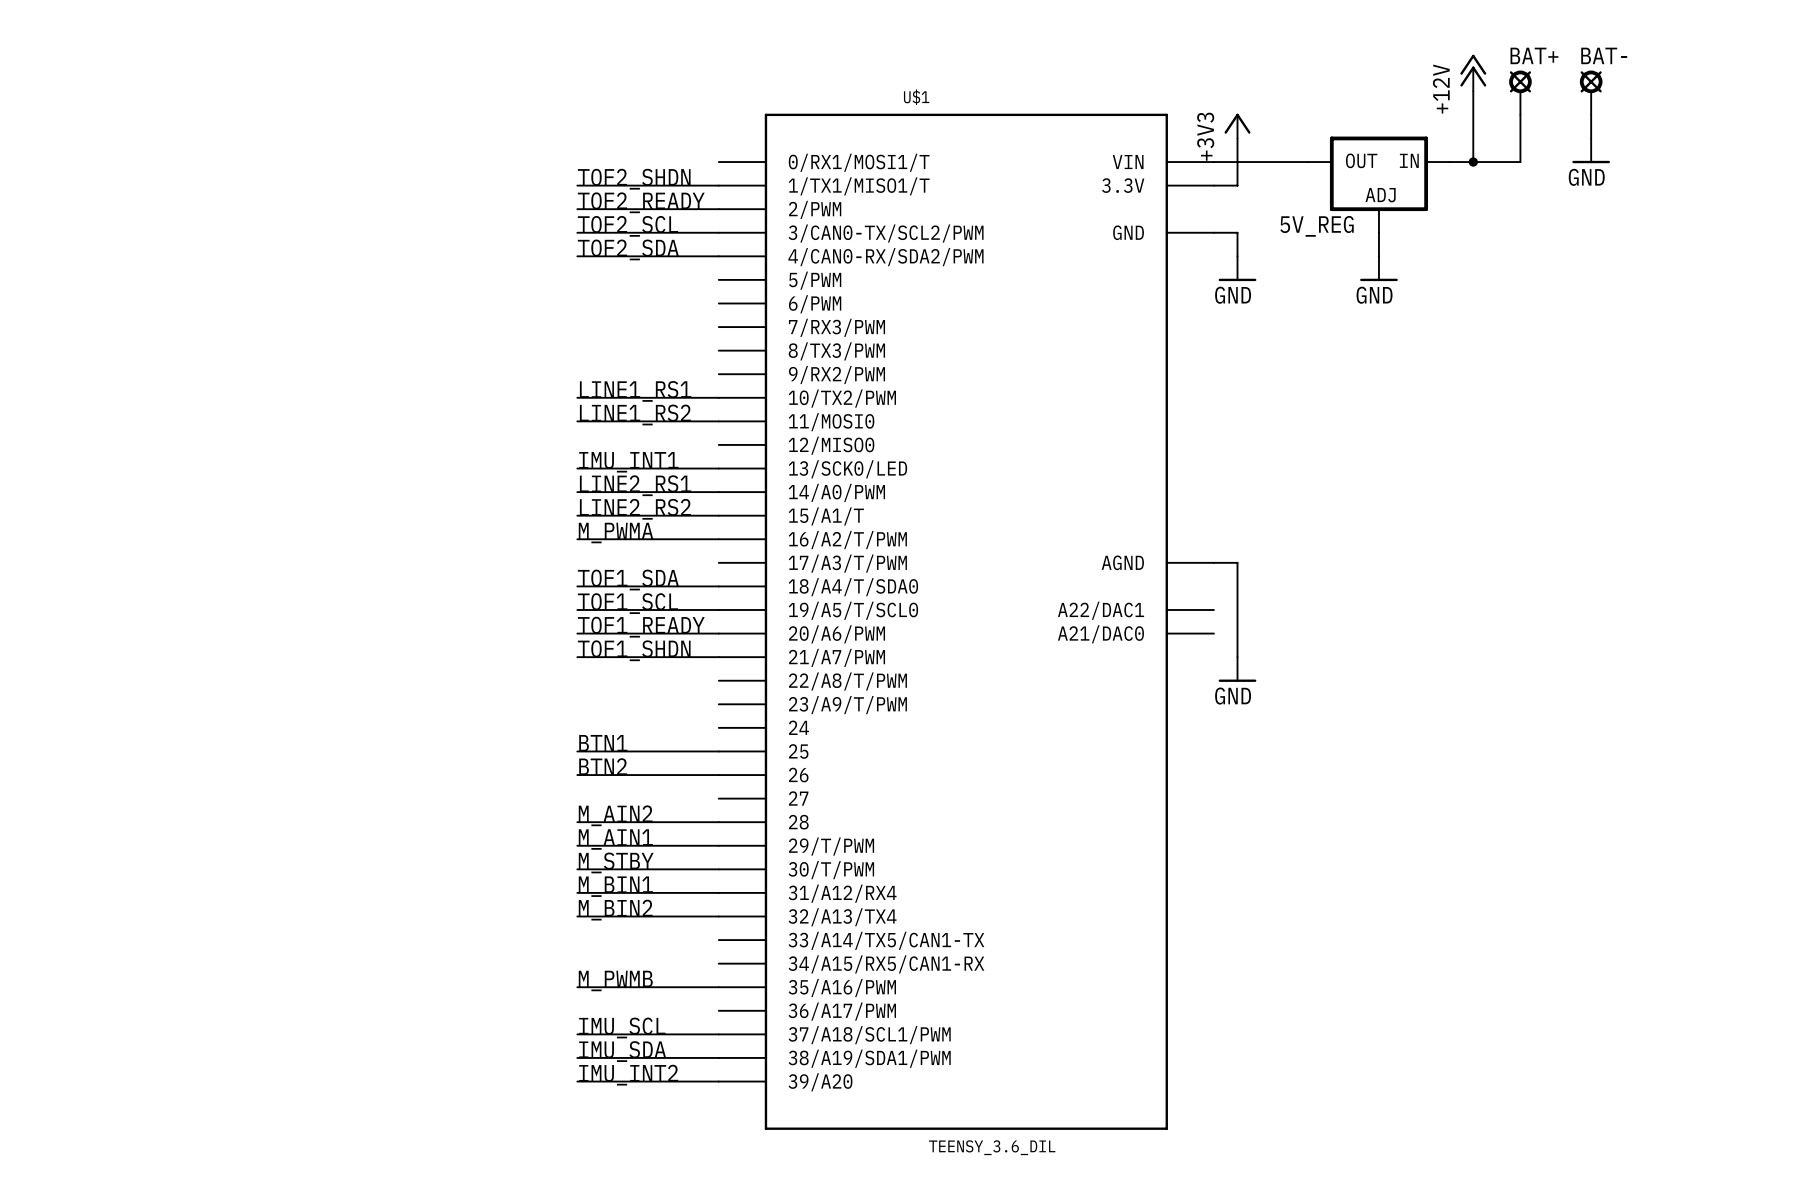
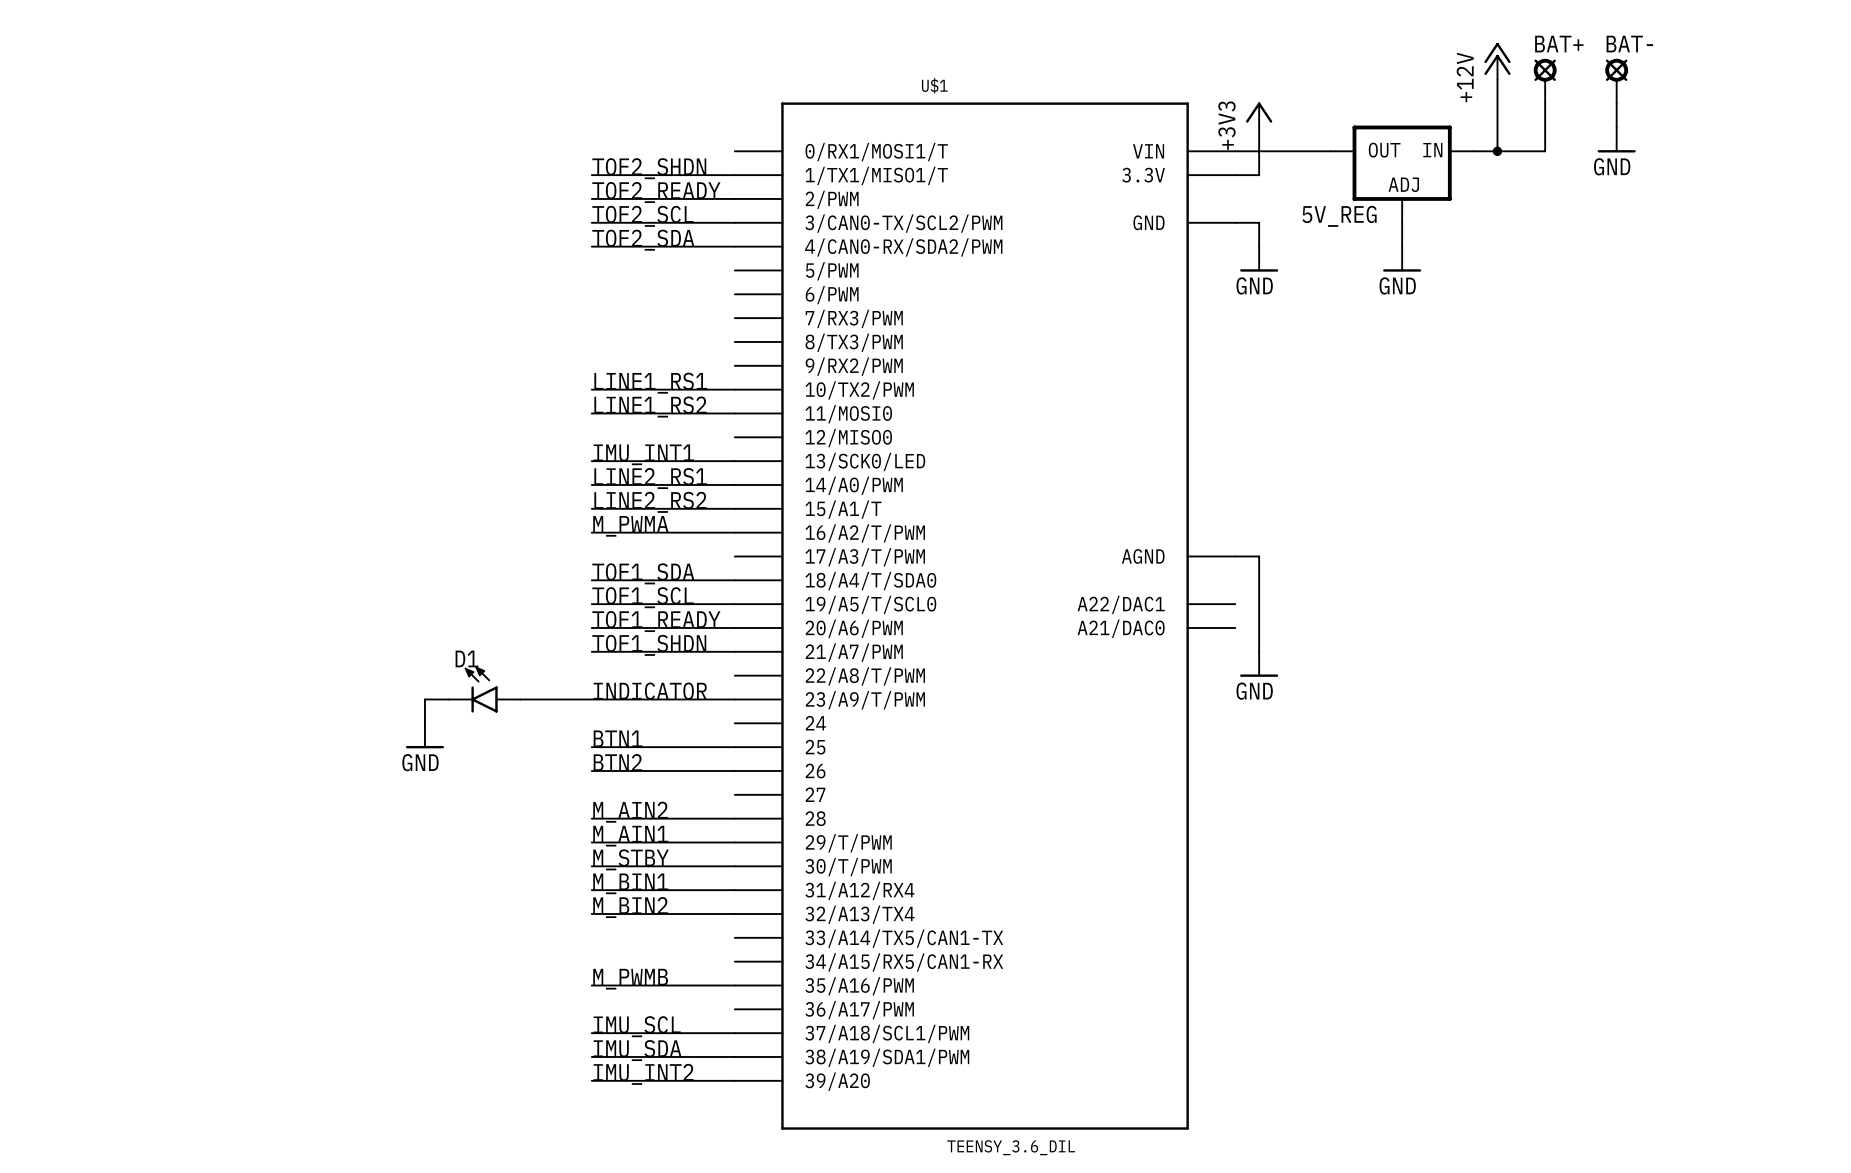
D1: none -> (484, 689)
label: none -> INDICATOR (650, 691)
wire: none -> (448, 699) (424, 699) (424, 723)
wire: none -> (520, 699) (734, 699)
power symbol: none -> GND (424, 735)

